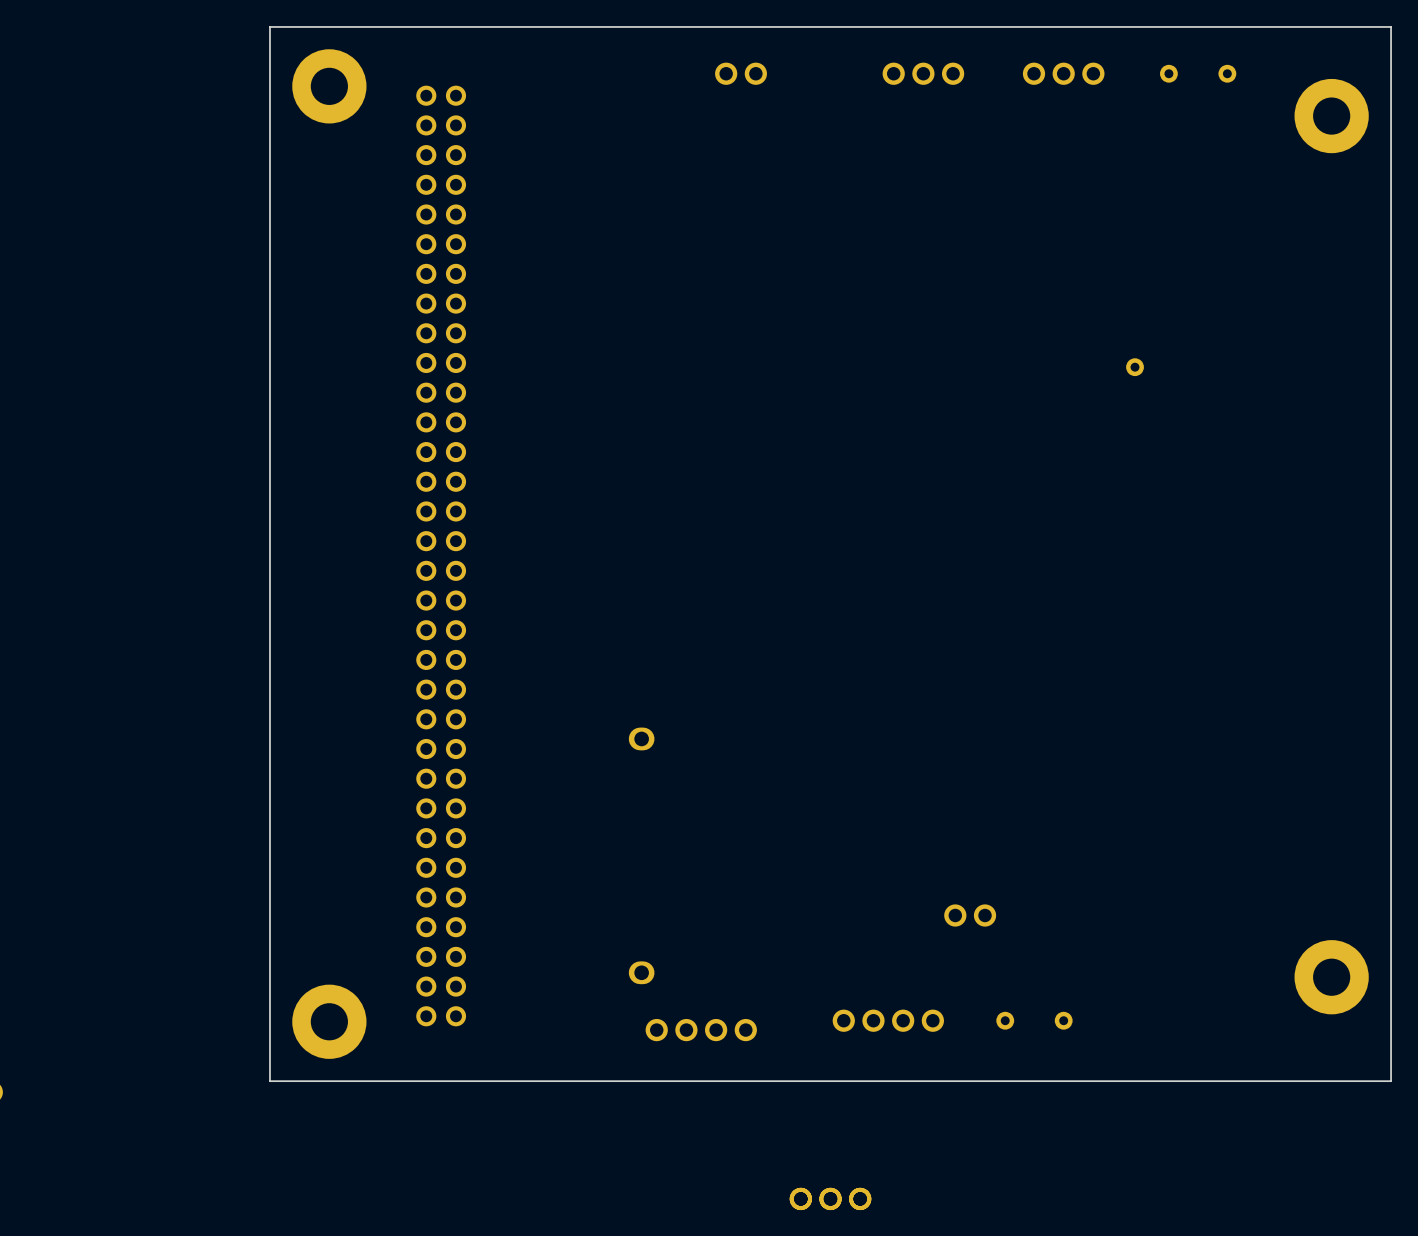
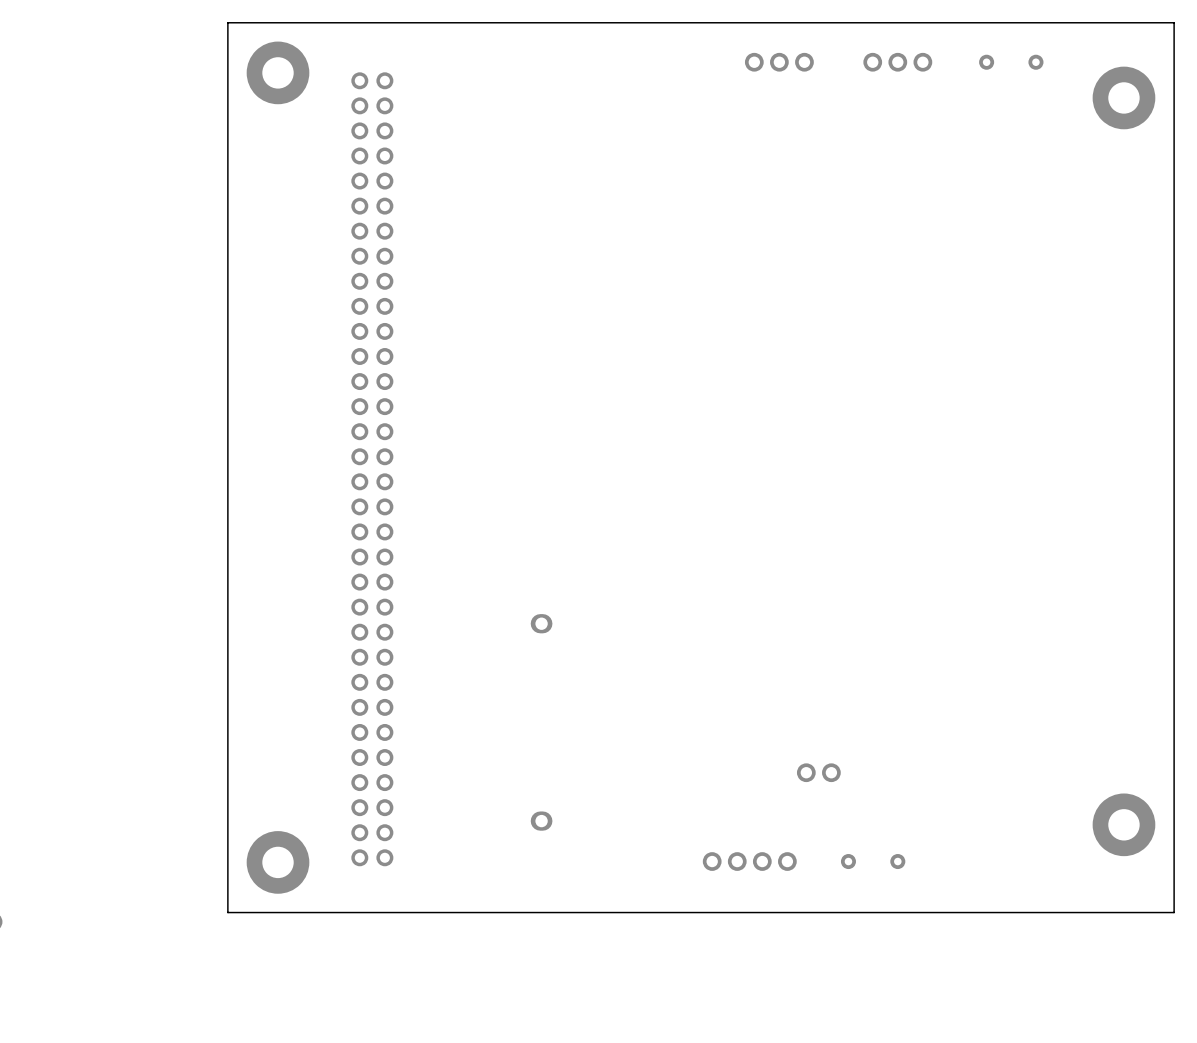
part: (741, 73) -> none
part: (1135, 367) -> none
part: (701, 1030) -> none
part: (830, 1198) -> none

